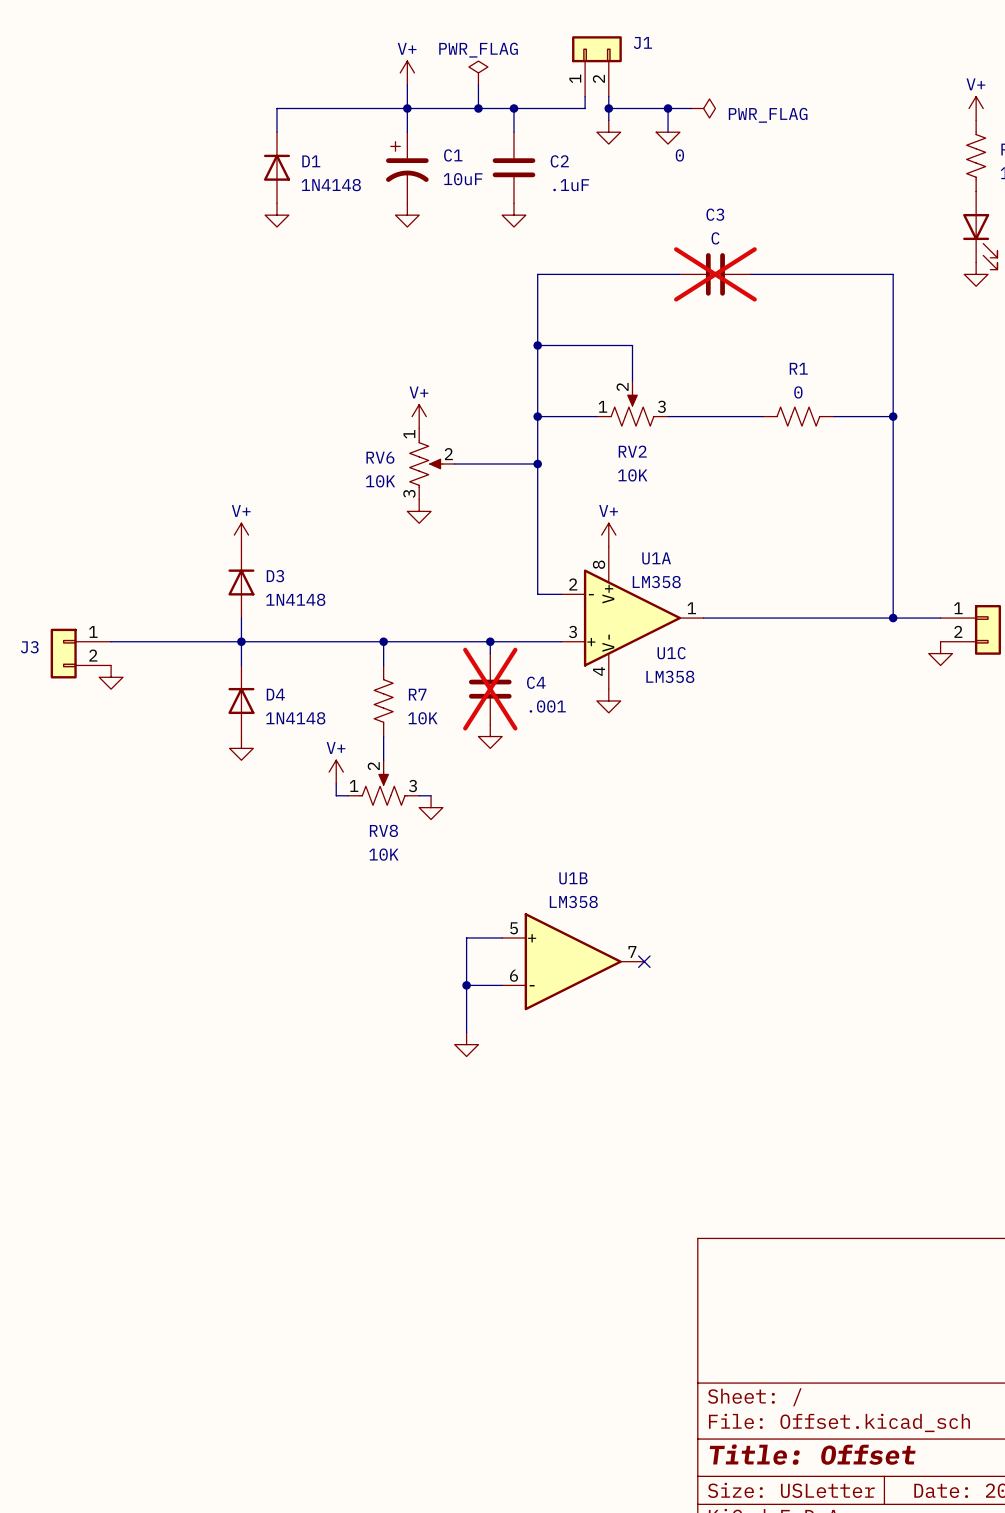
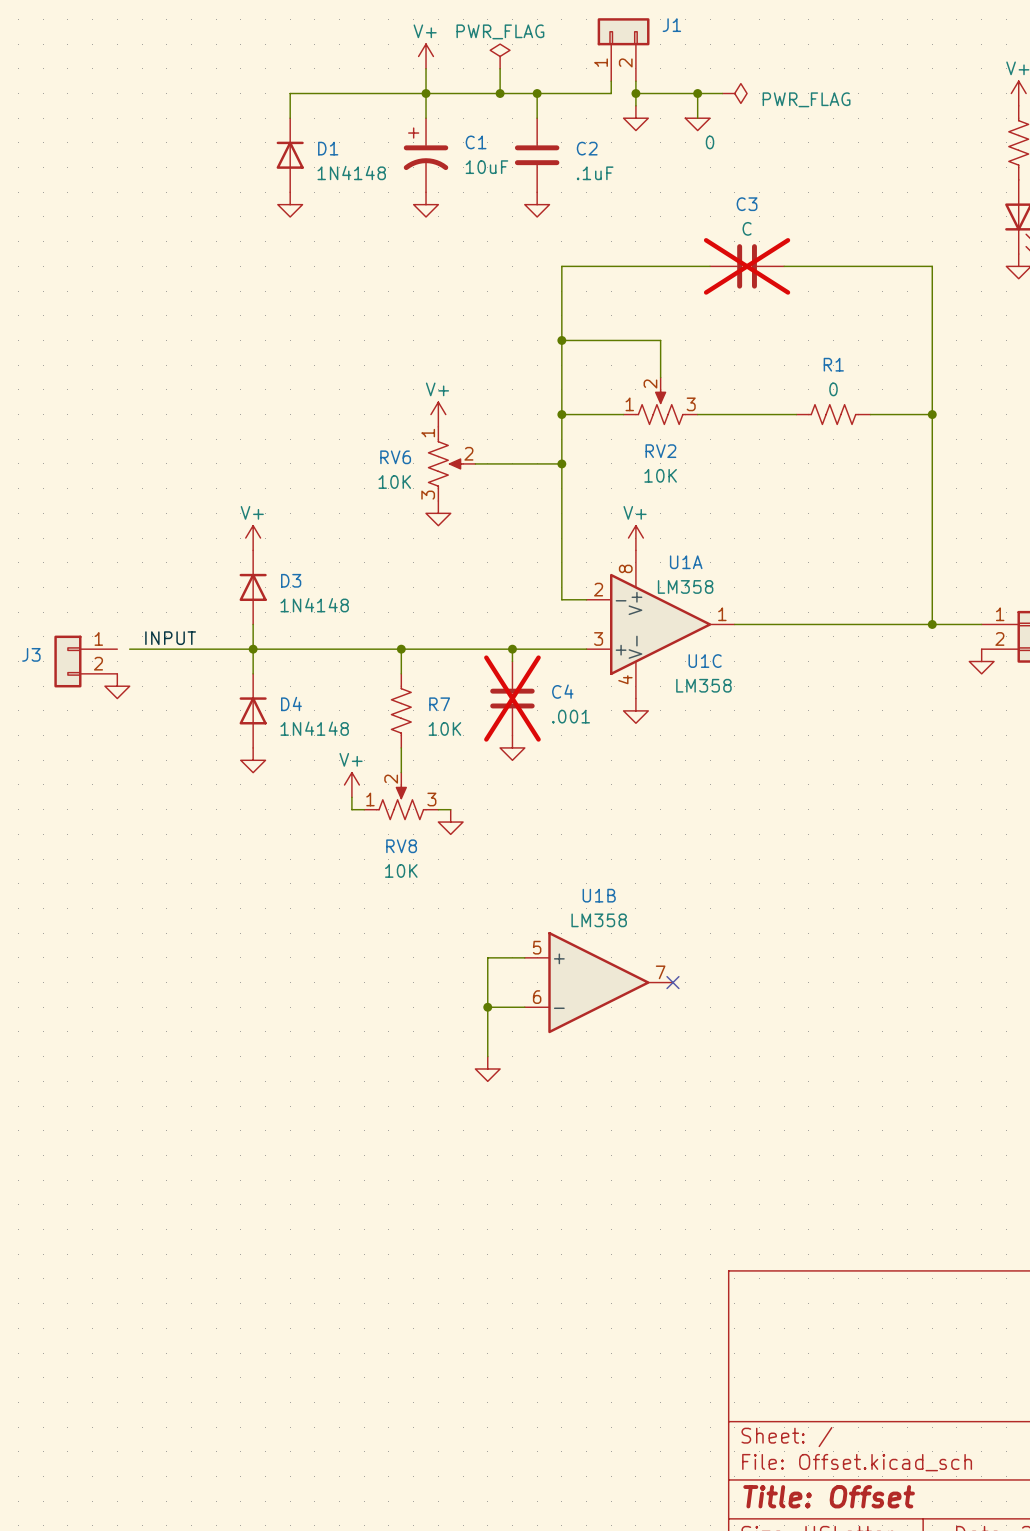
label: none -> INPUT (170, 638)
wire: (111, 641) (122, 641) -> none

